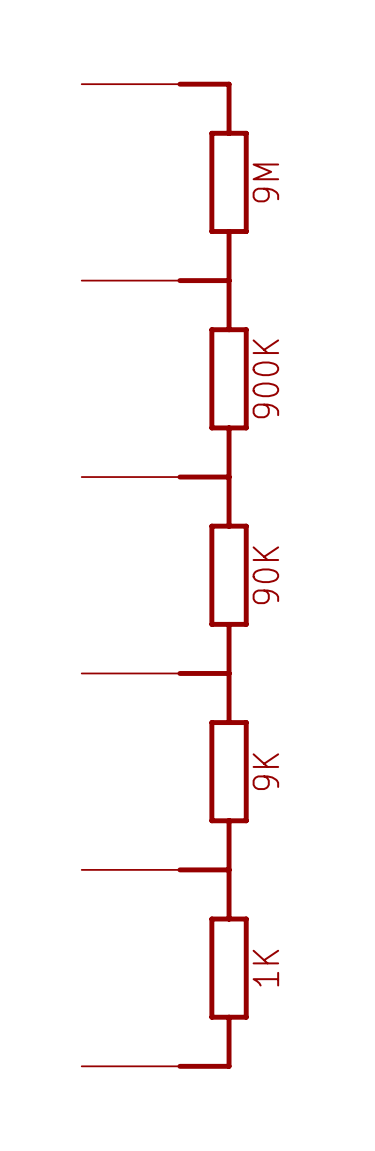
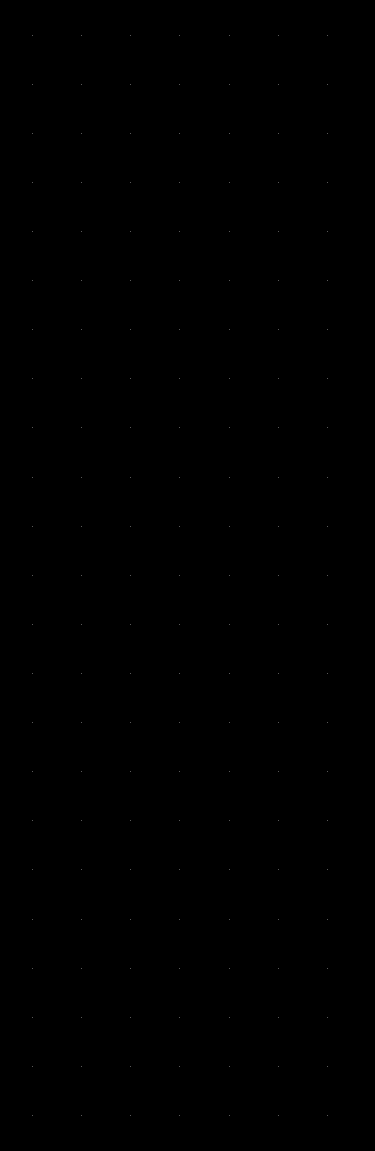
part: (165, 575) -> none

